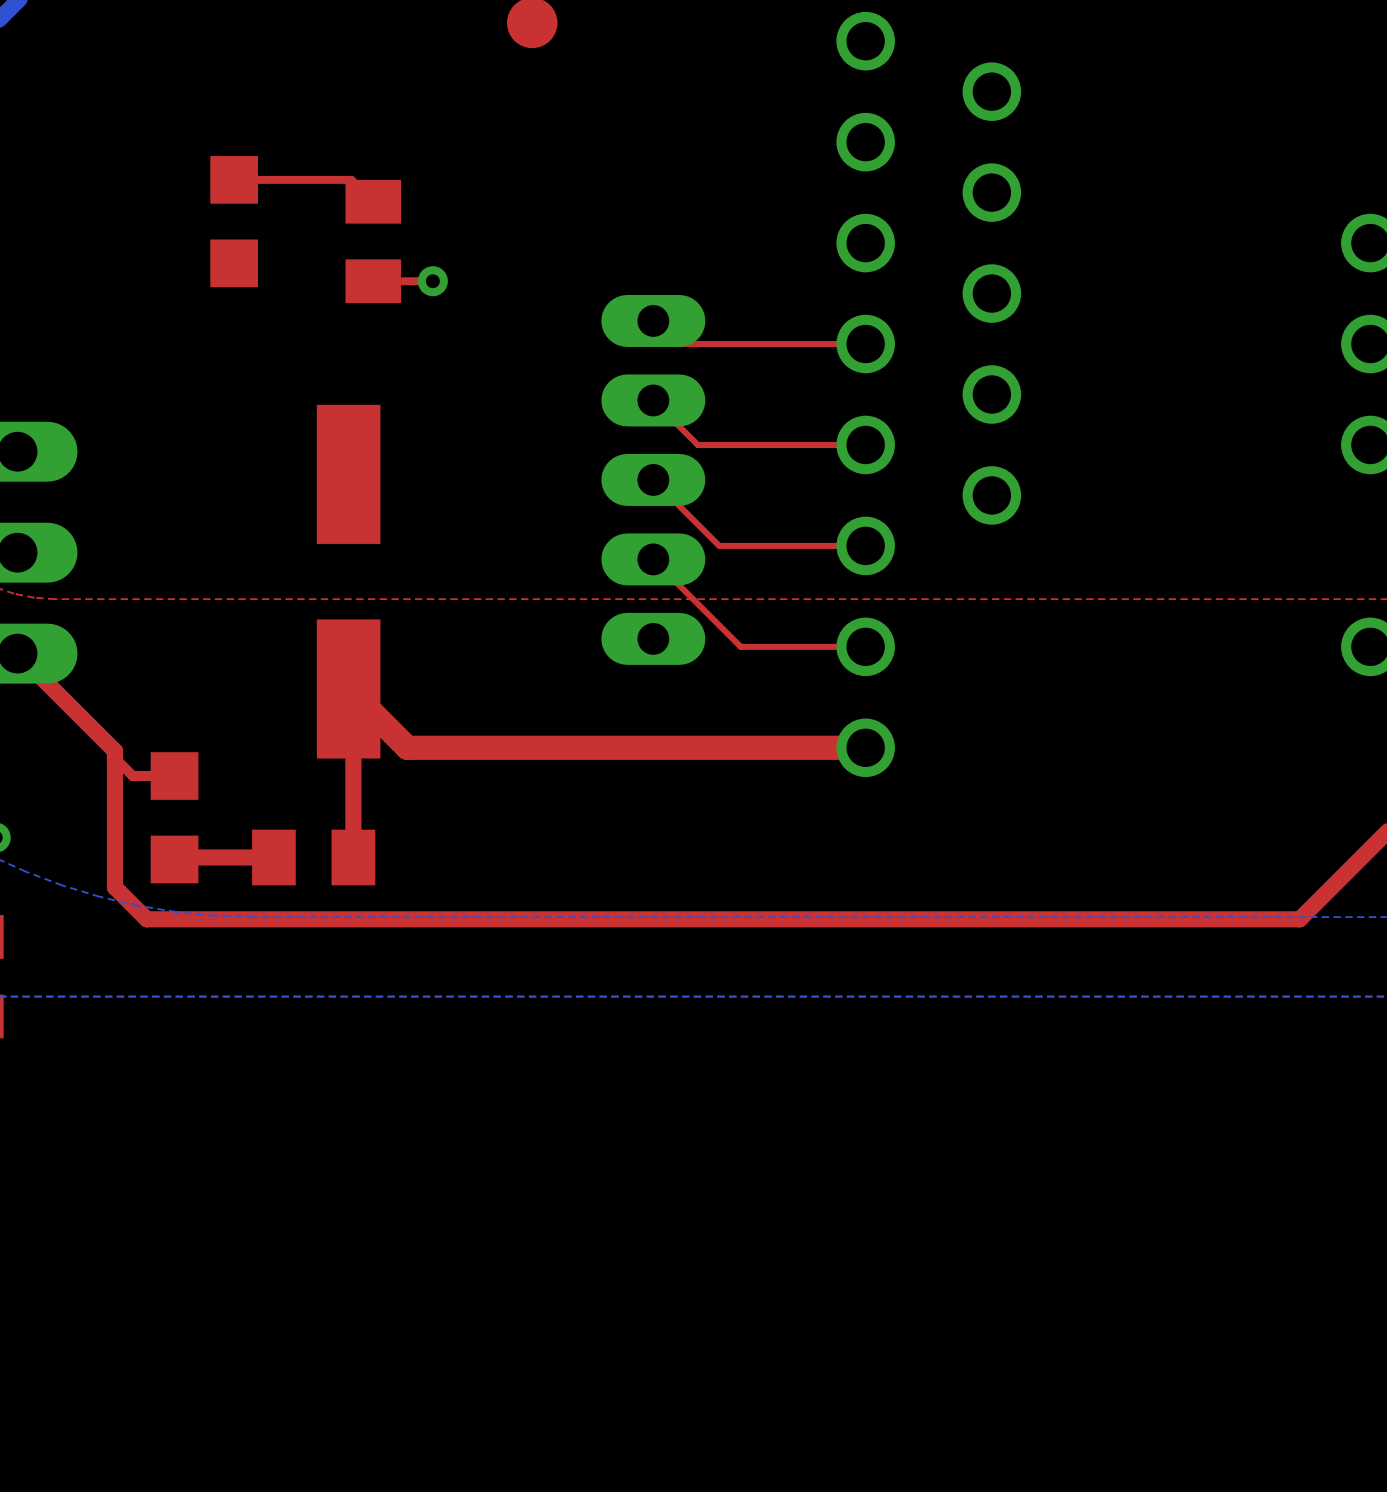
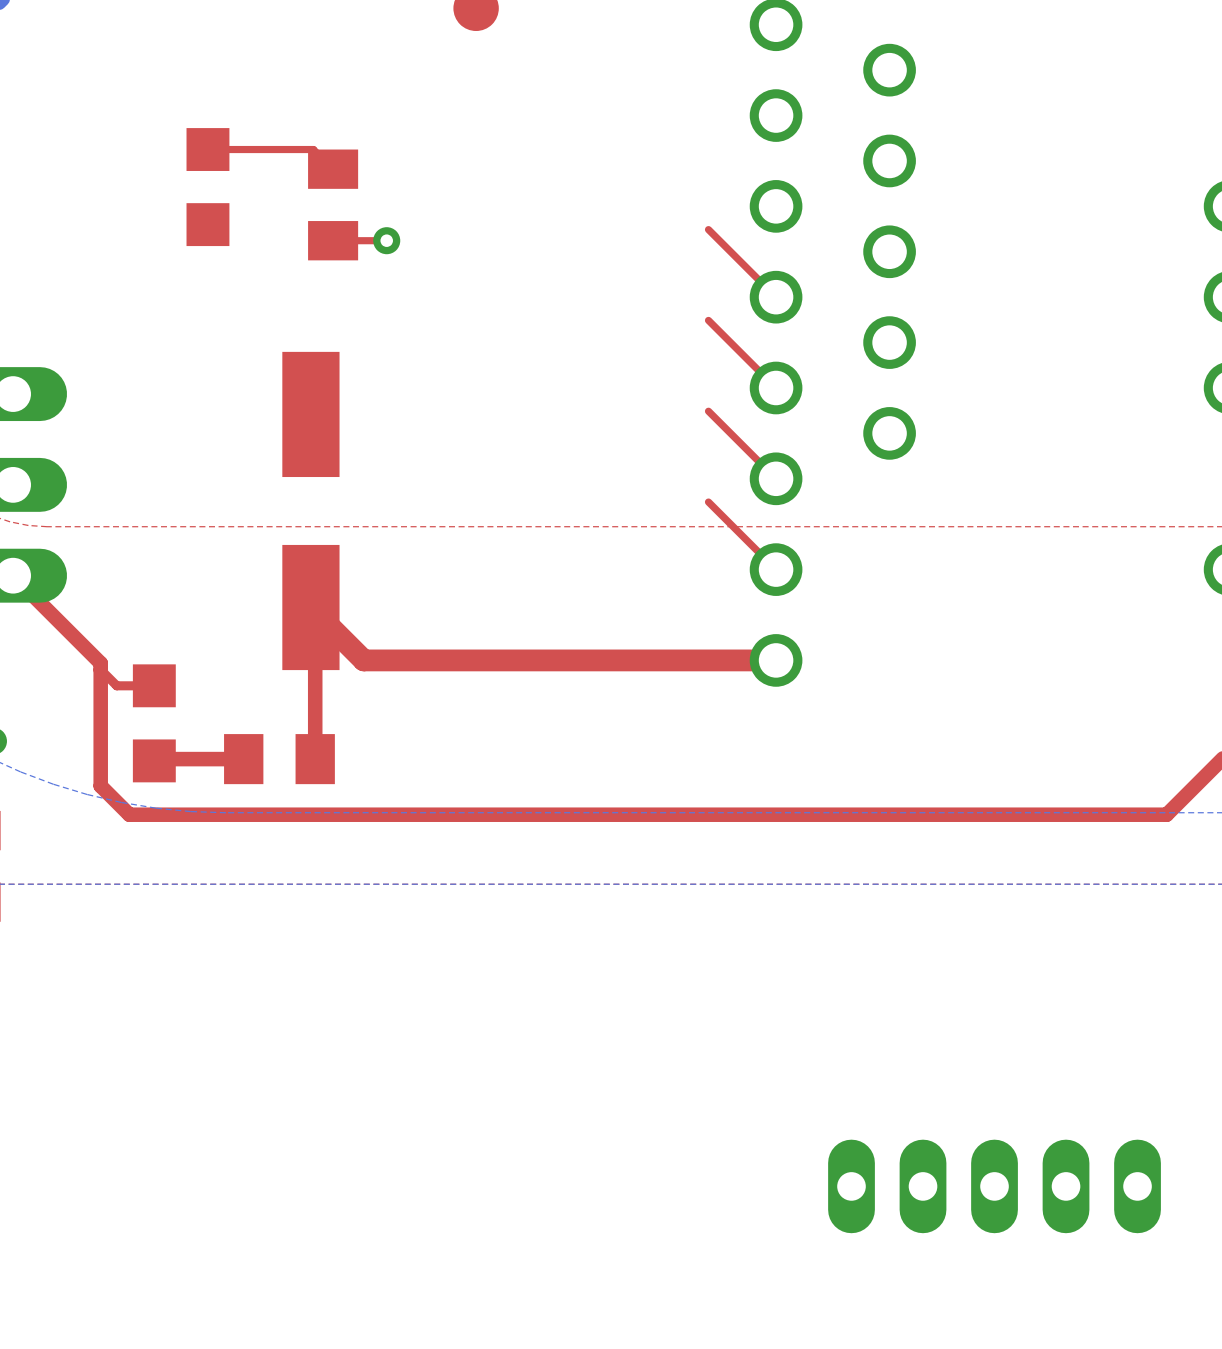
top track: (653, 320) (676, 344) (865, 344) -> (708, 229) (776, 297)
top track: (653, 400) (697, 444) (865, 444) -> (708, 320) (776, 387)
top track: (653, 479) (719, 545) (865, 545) -> (708, 411) (776, 478)
part rotation: 0° (653, 479) -> 90° clockwise (994, 1186)
part position: (653, 479) -> (994, 1186)
top track: (653, 559) (740, 646) (865, 646) -> (708, 502) (776, 569)

